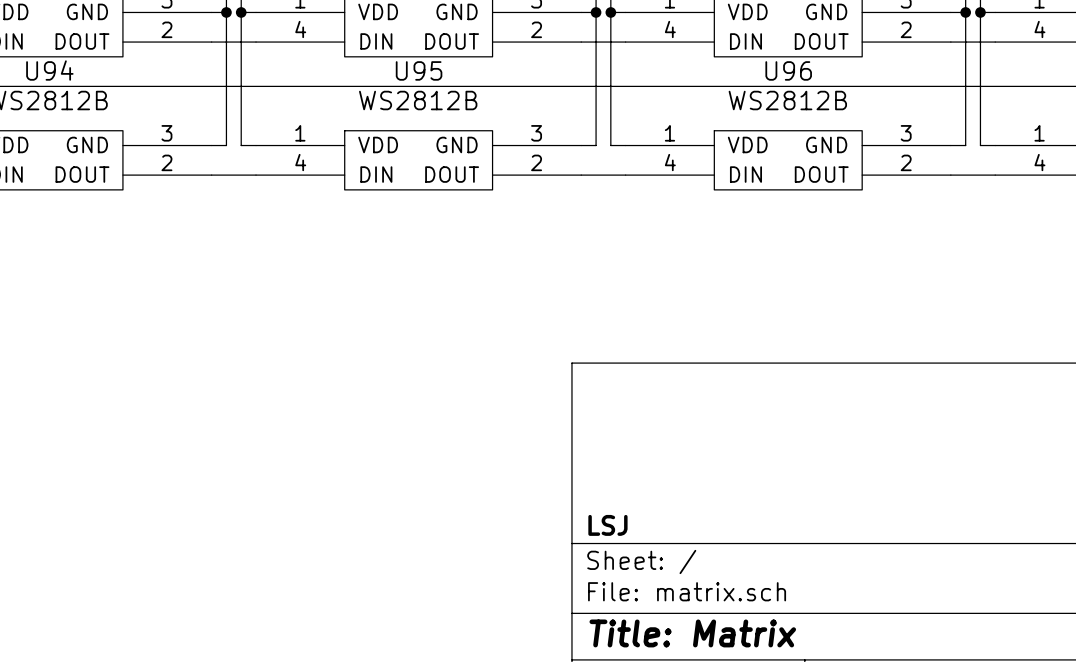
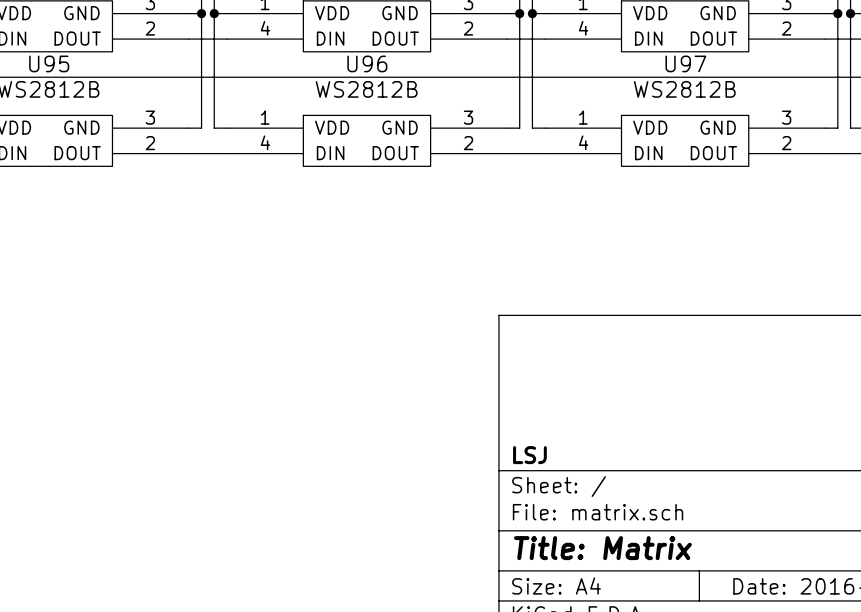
U94 name: U94 (49, 70) -> U95 (49, 63)
U95 name: U95 (419, 70) -> U96 (367, 63)
U96 name: U96 (788, 70) -> U97 (685, 63)

